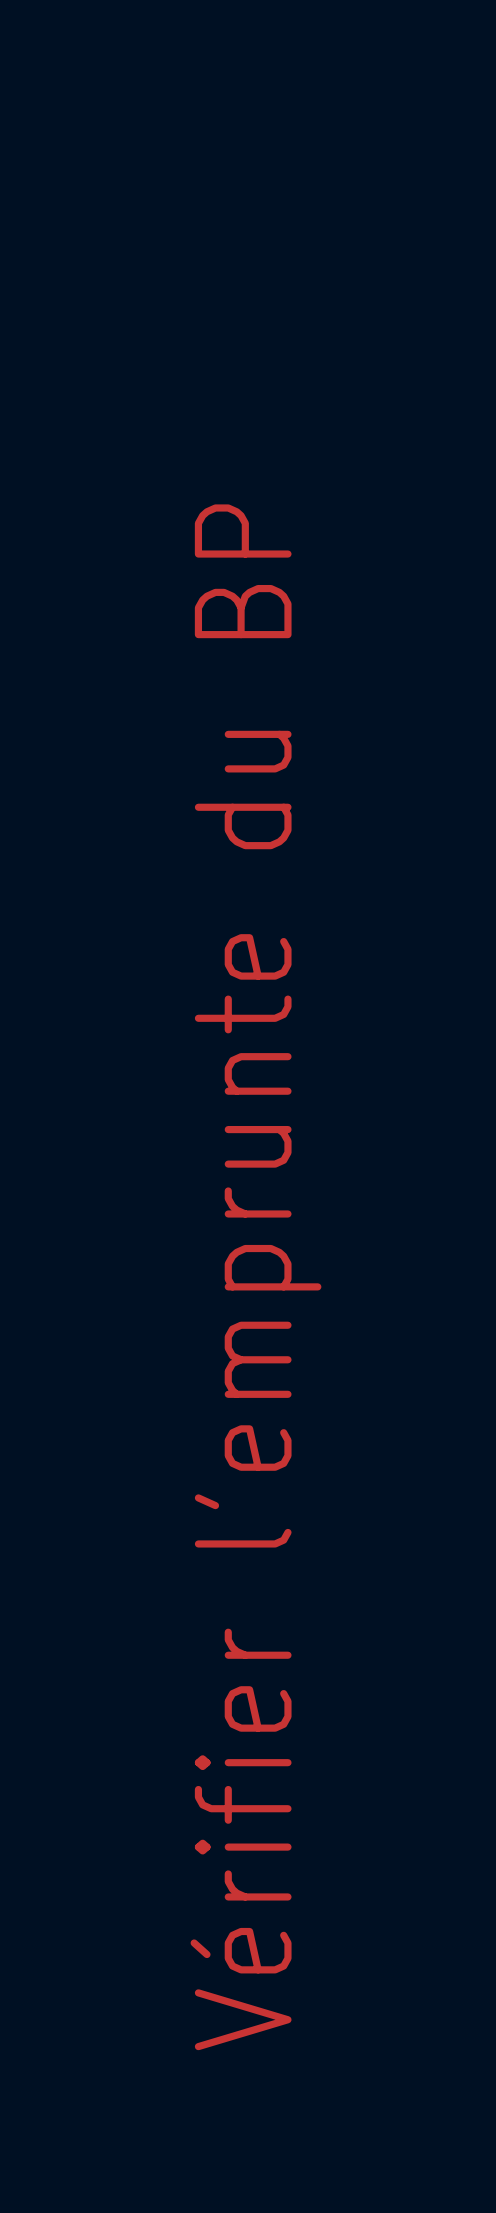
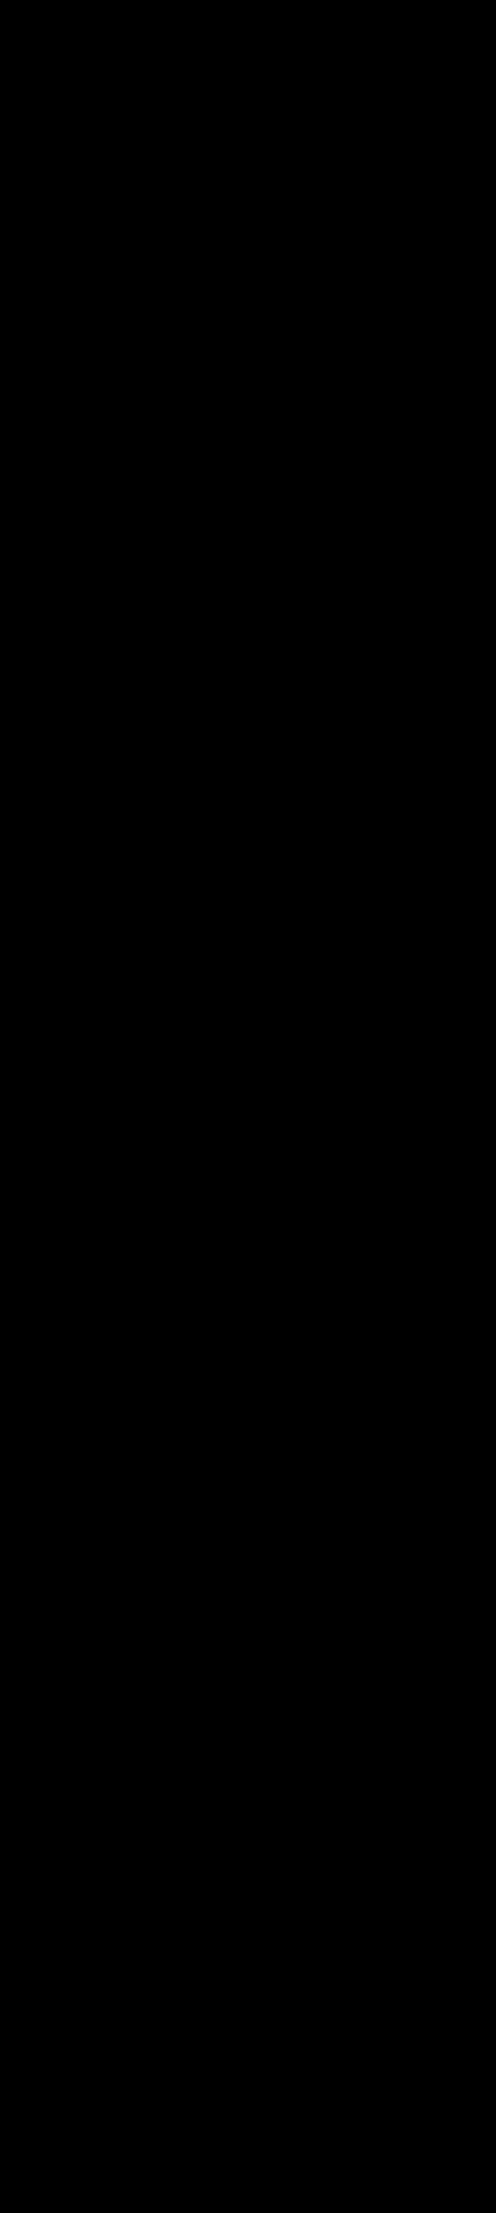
text: Vérifier l'emprunte du BP (255, 1277) -> none

